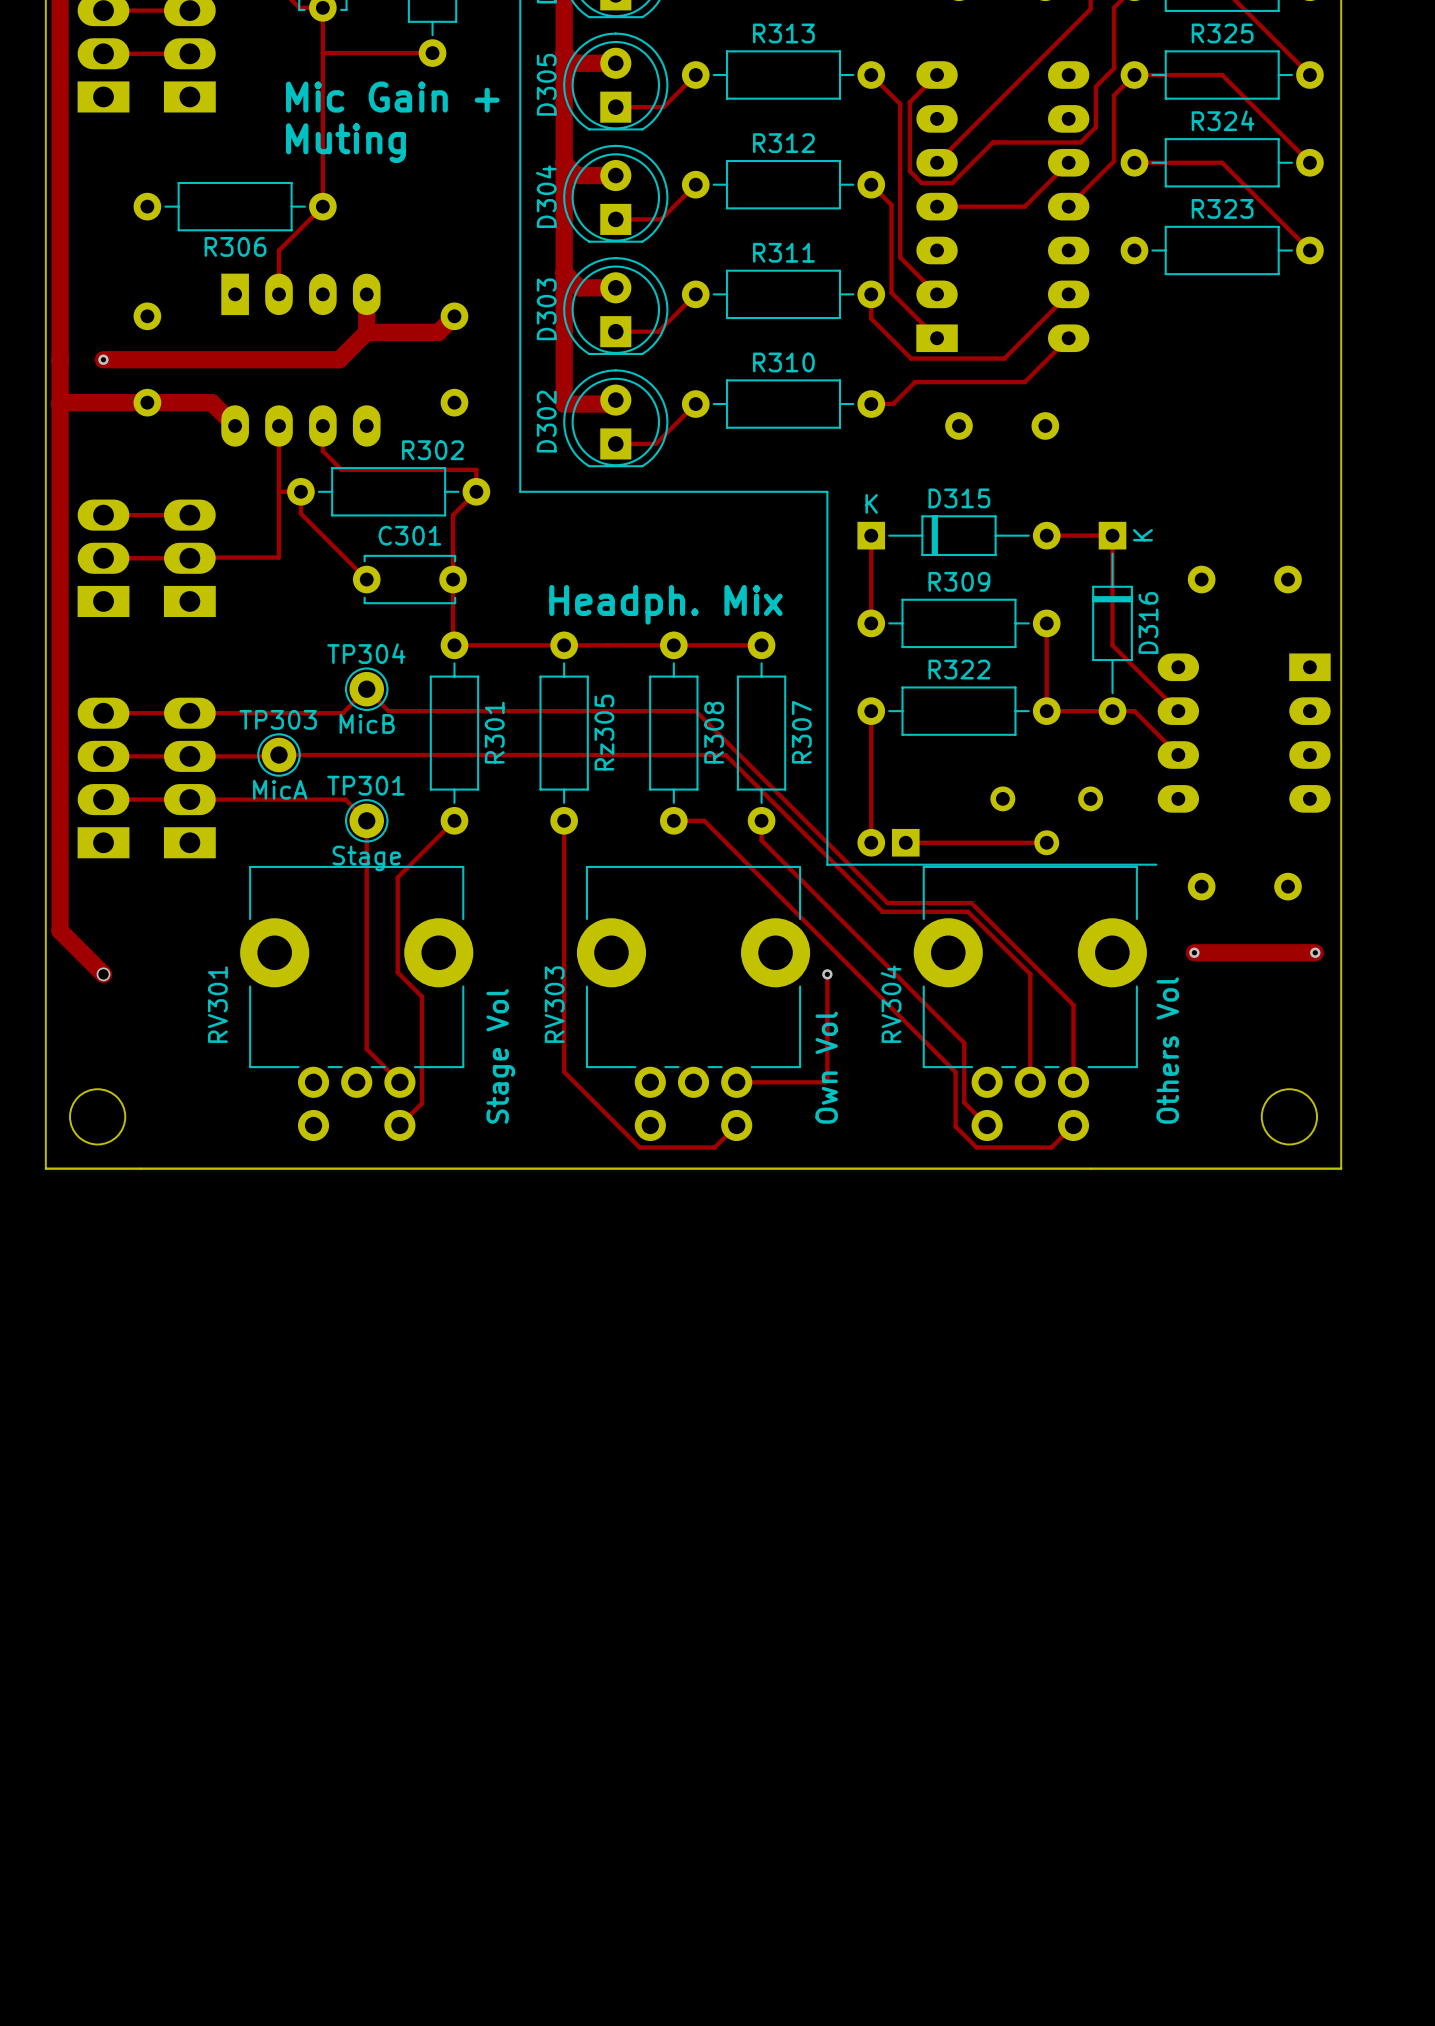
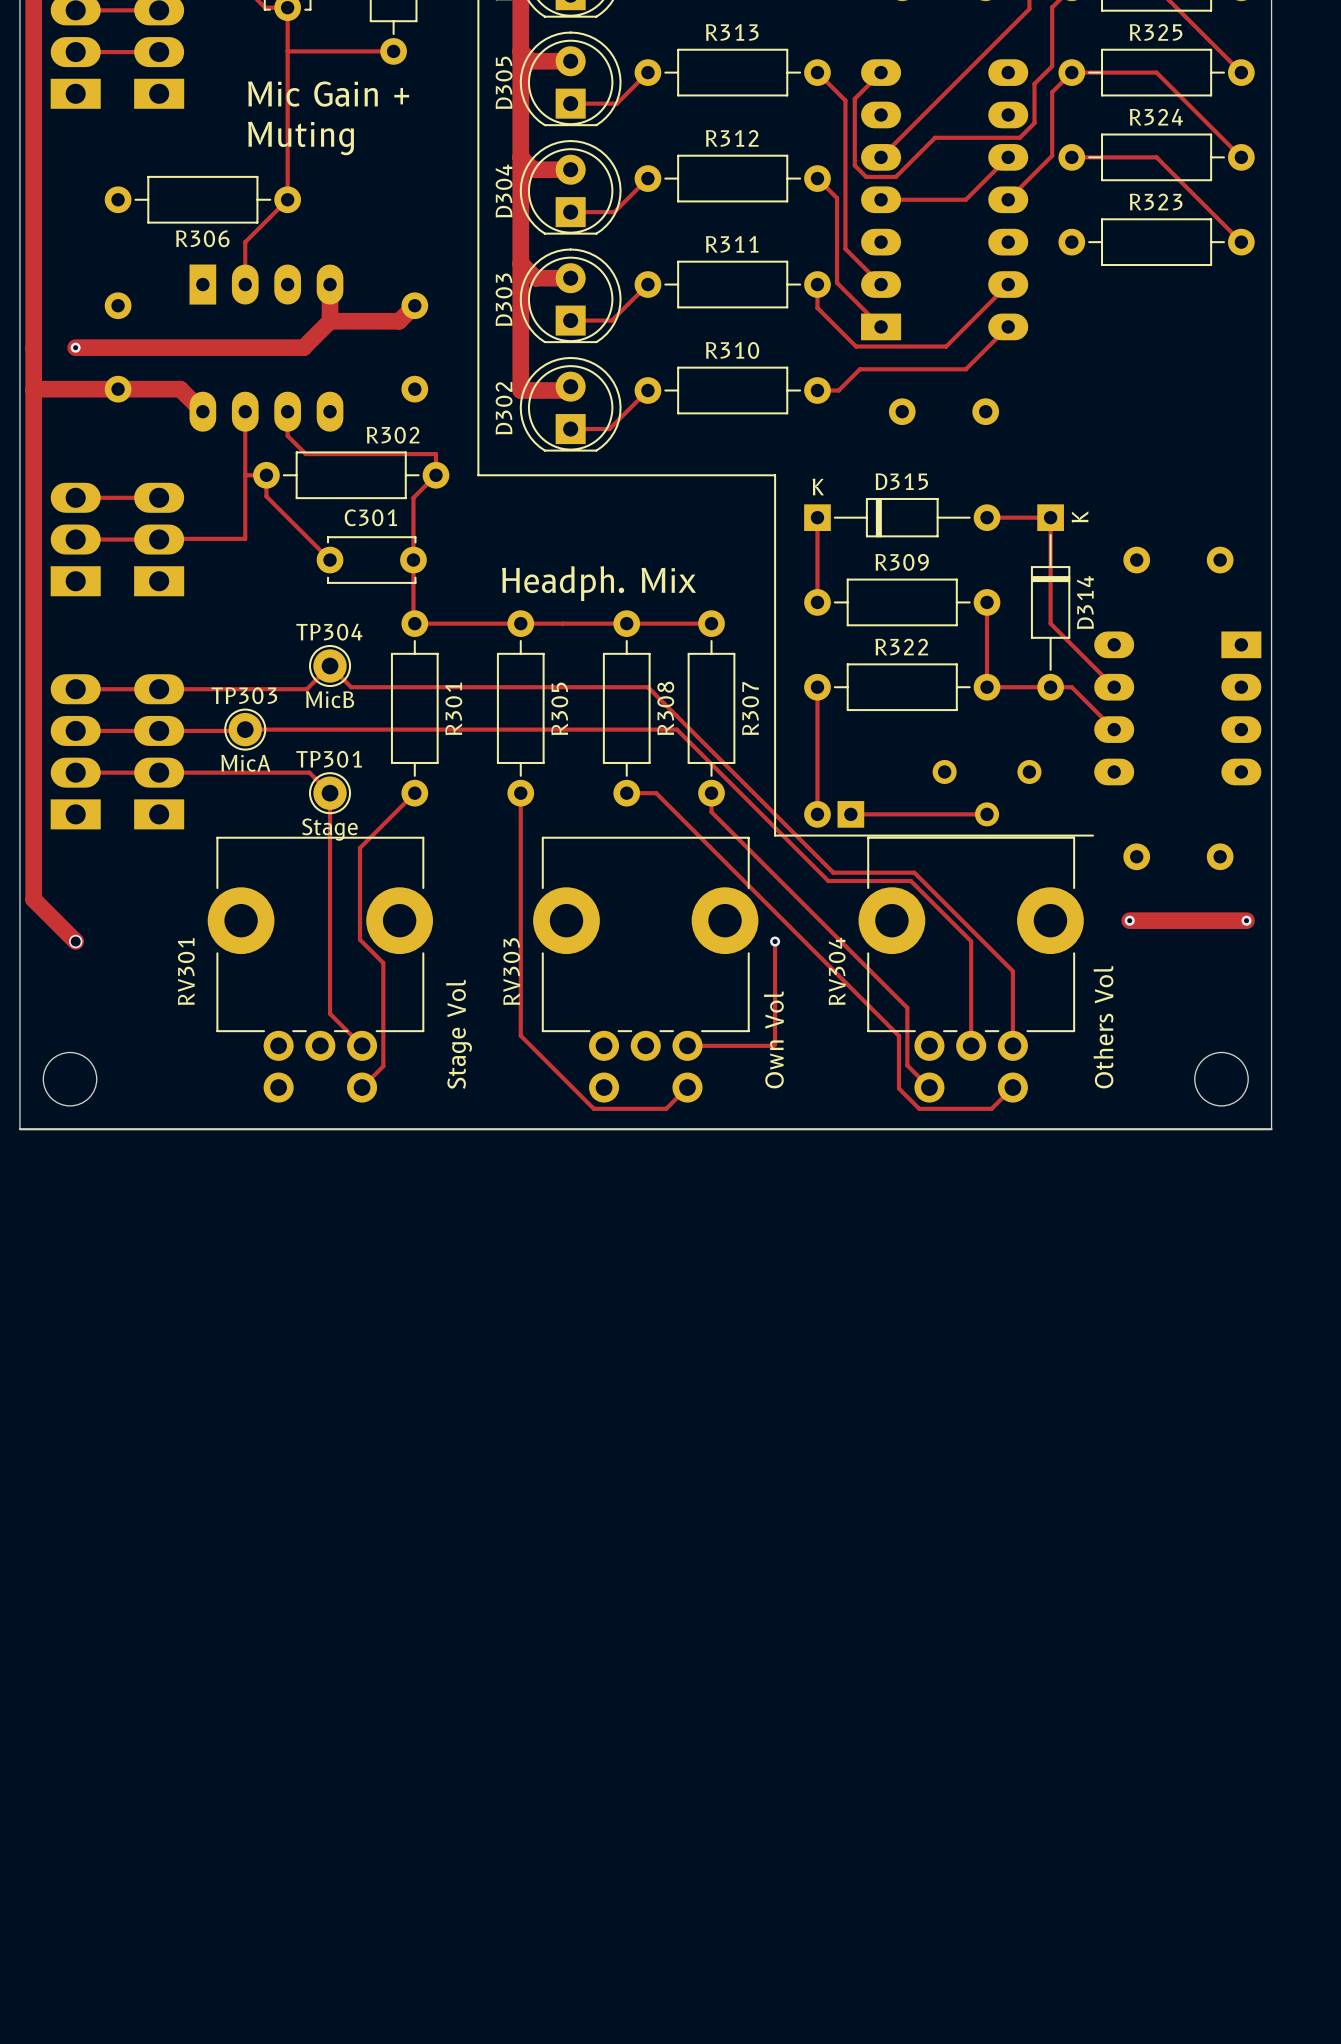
D316 name: D316 (1148, 622) -> D314 (1085, 602)
Rz305 name: Rz305 (604, 732) -> R305 (559, 708)

